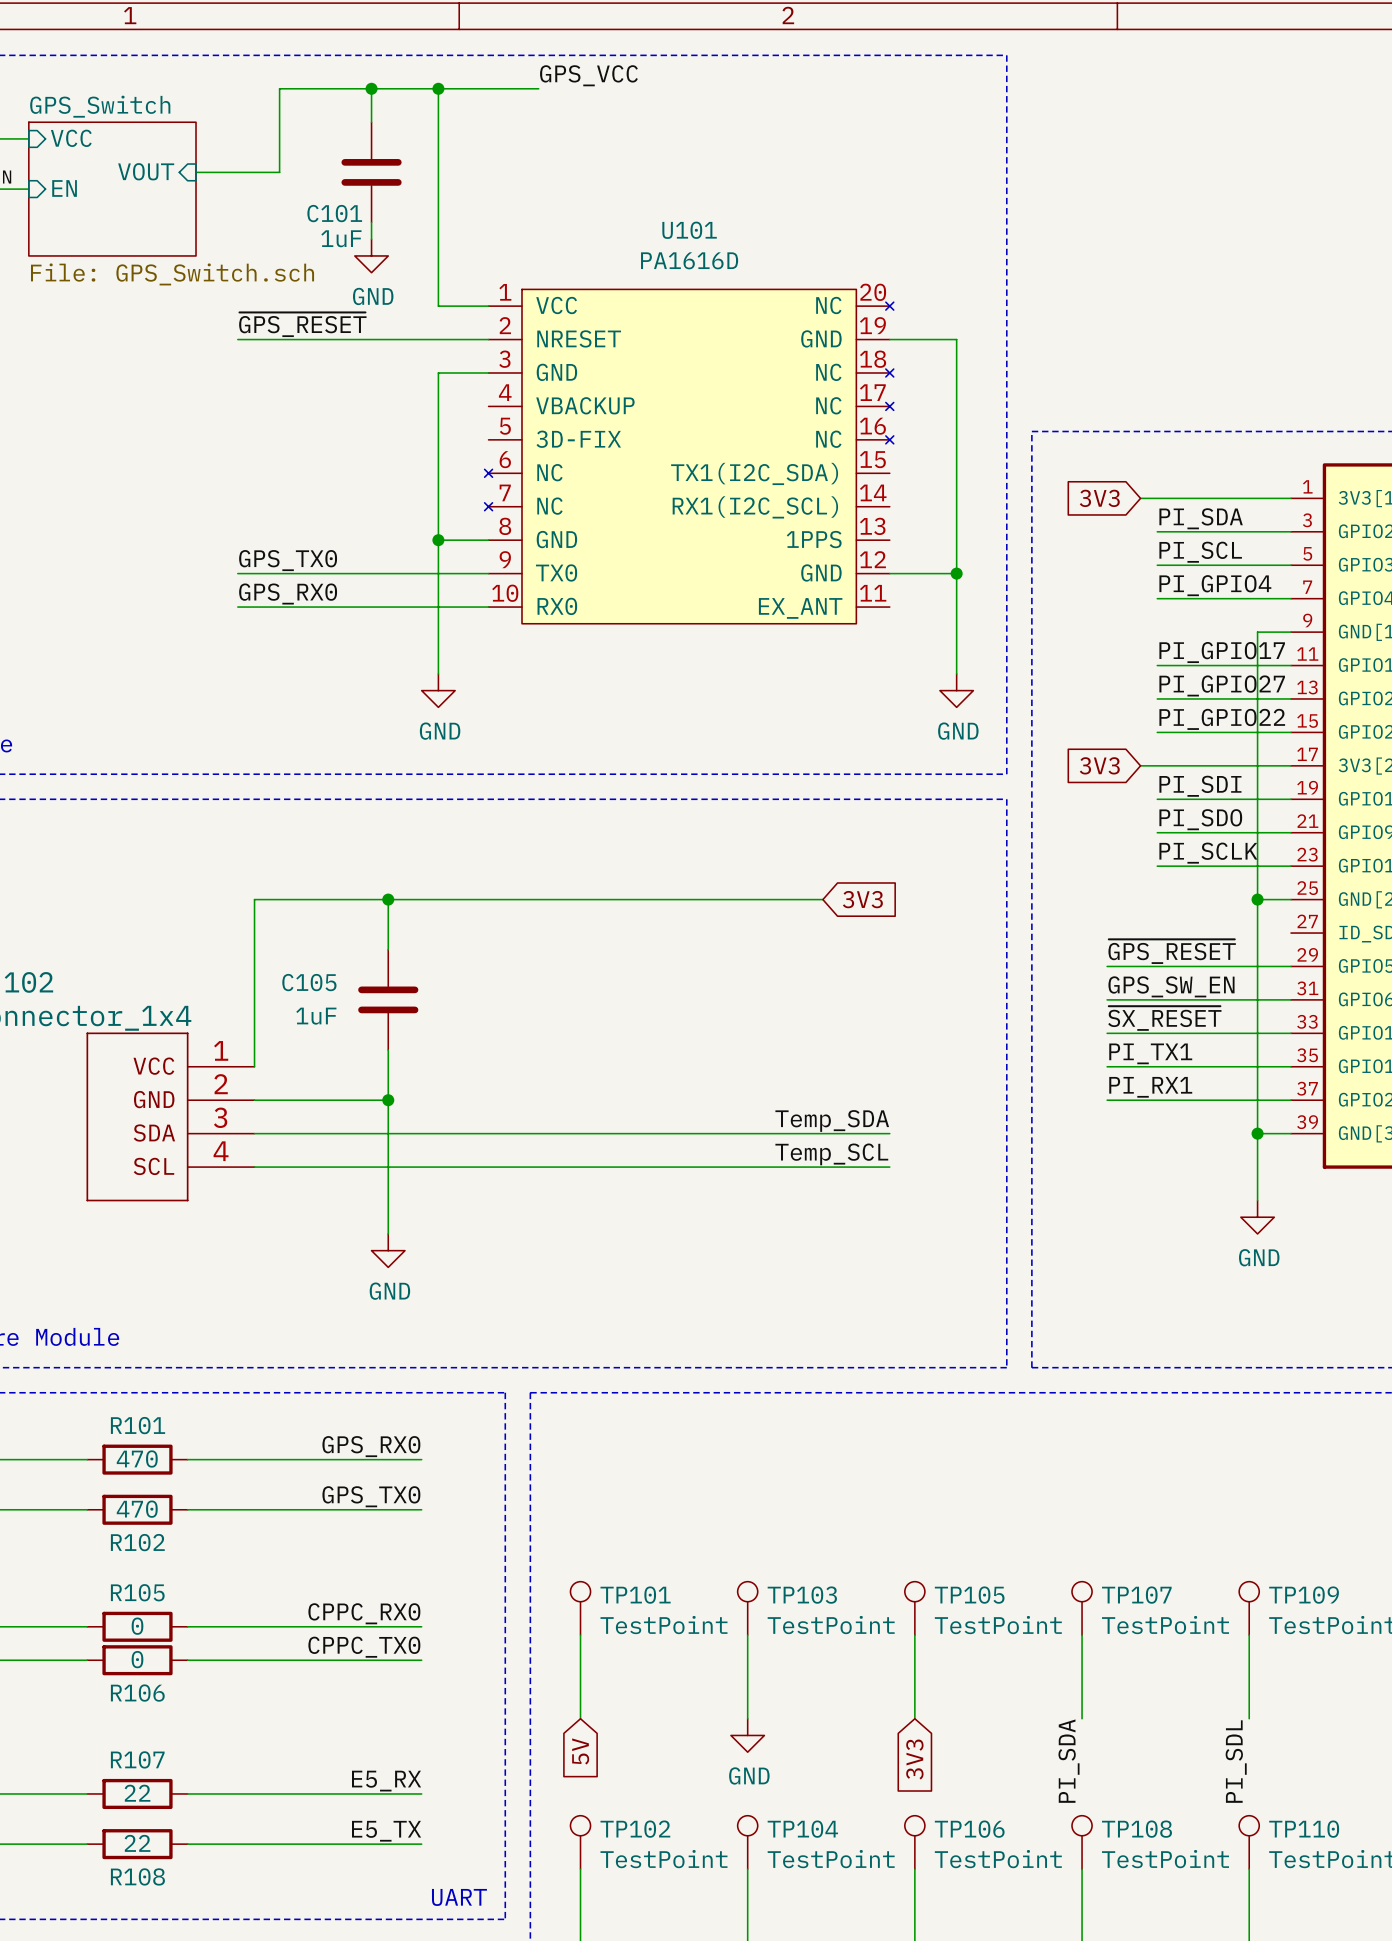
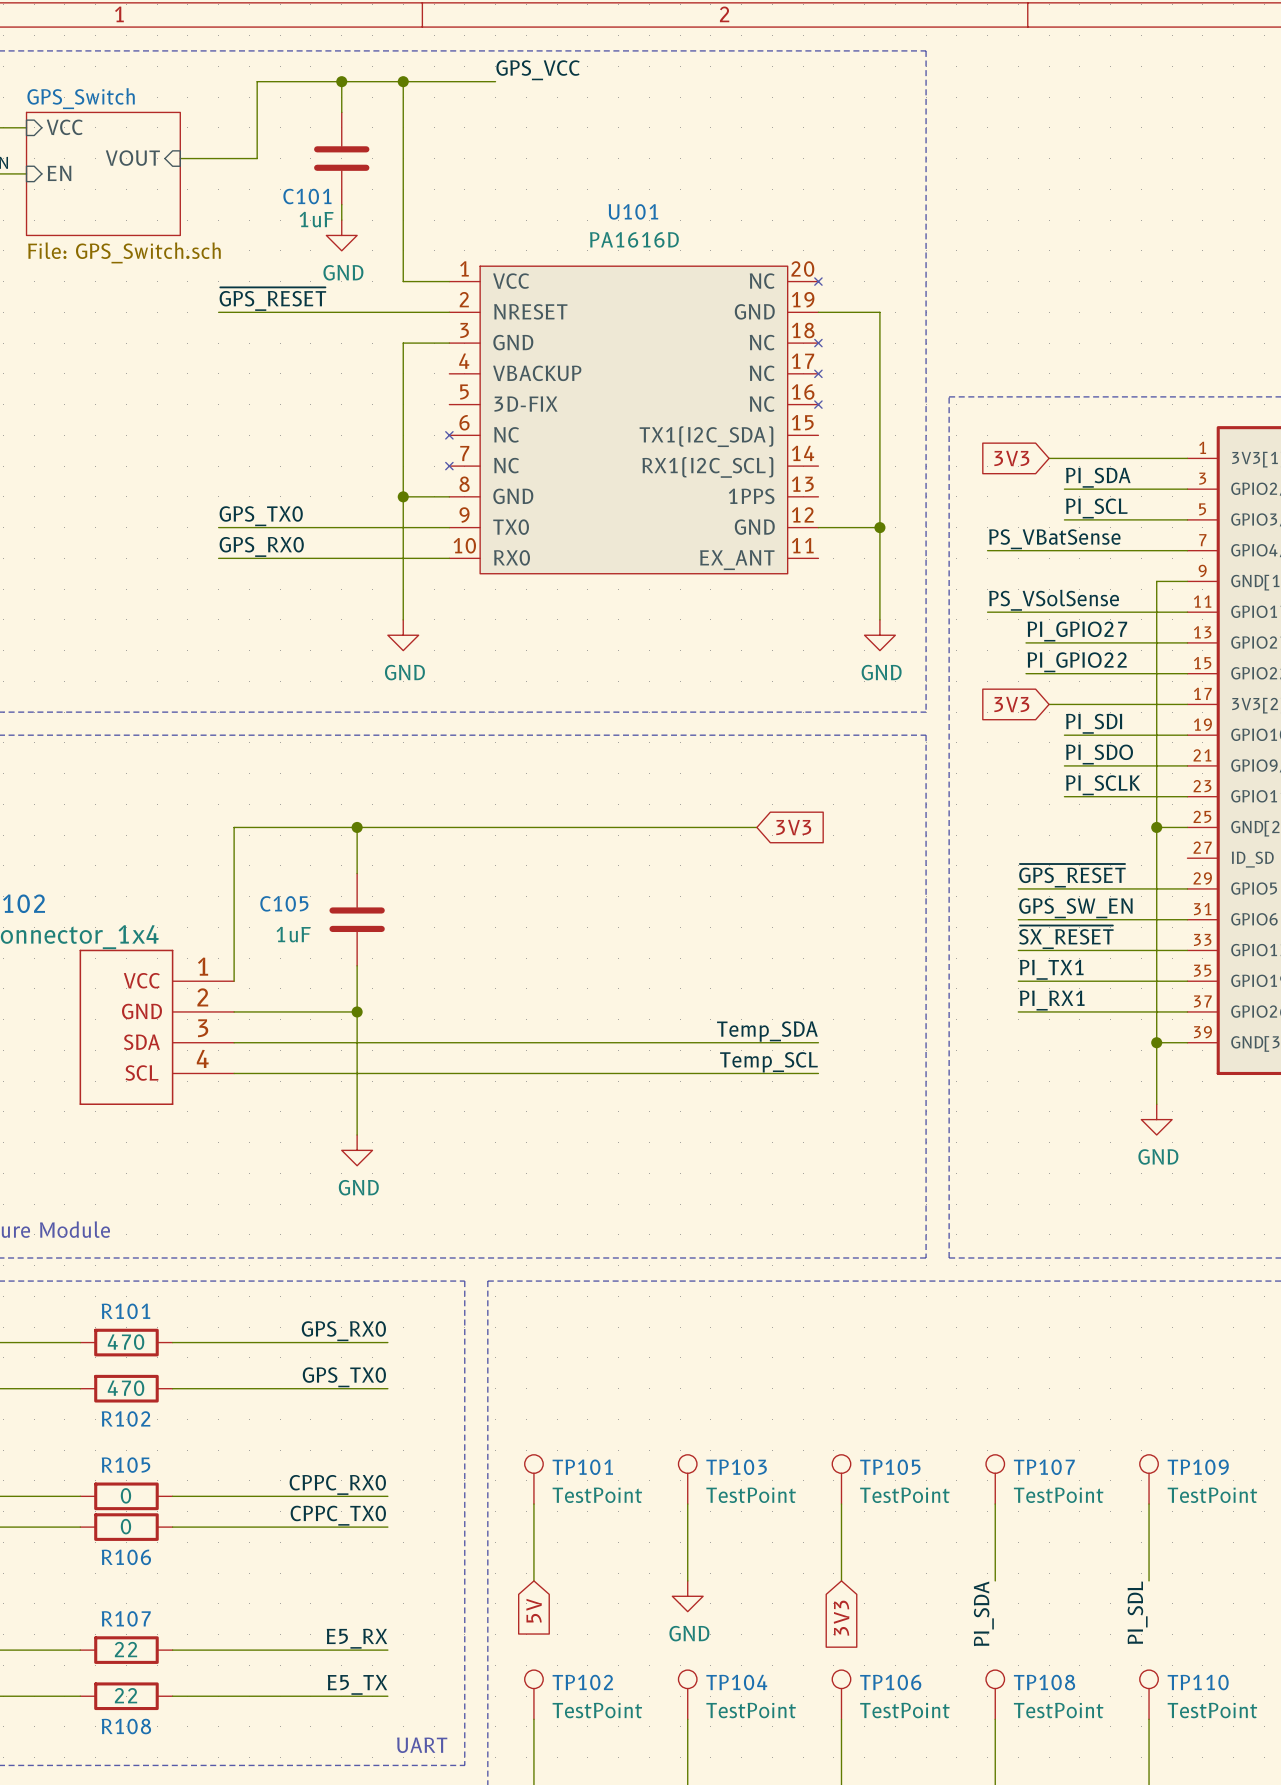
label: none -> PS_VBatSense (1054, 539)
label: PI_GPIO4 (1215, 585) -> none
wire: none -> (987, 550) (1064, 550)
label: none -> PS_VSolSense (1054, 600)
label: PI_GPIO17 (1222, 652) -> none
wire: none -> (987, 612) (1064, 612)
label position: PI_GPIO27 (1222, 685) -> PI_GPIO27 (1077, 631)
wire: none -> (1026, 642) (1064, 642)
label position: PI_GPIO22 (1222, 719) -> PI_GPIO22 (1077, 662)
wire: none -> (1026, 673) (1064, 673)

